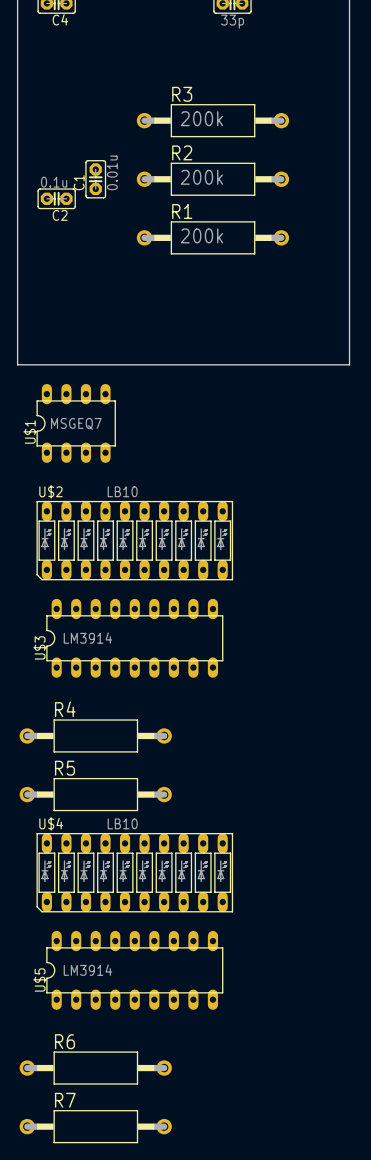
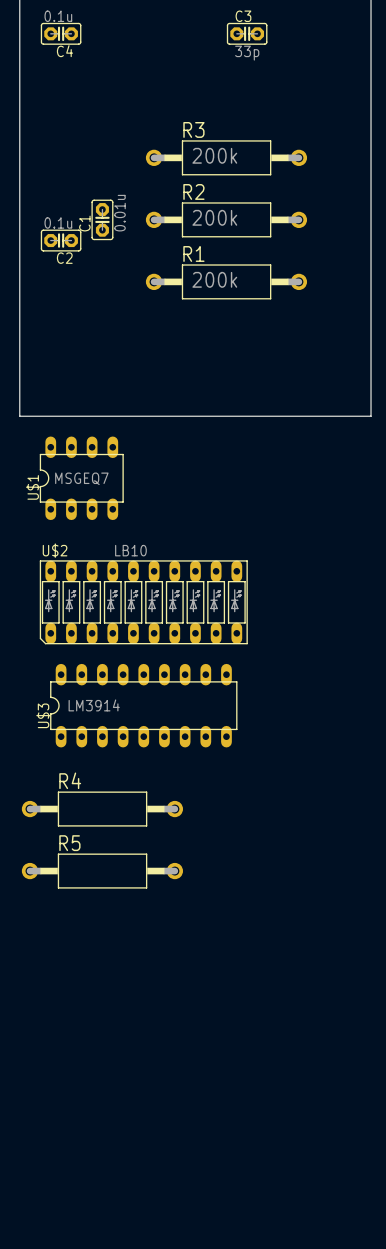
U$4: LB10 (134, 872) -> none
U$5: LM3914 (134, 970) -> none
R6: (95, 1068) -> none
R7: (95, 1126) -> none

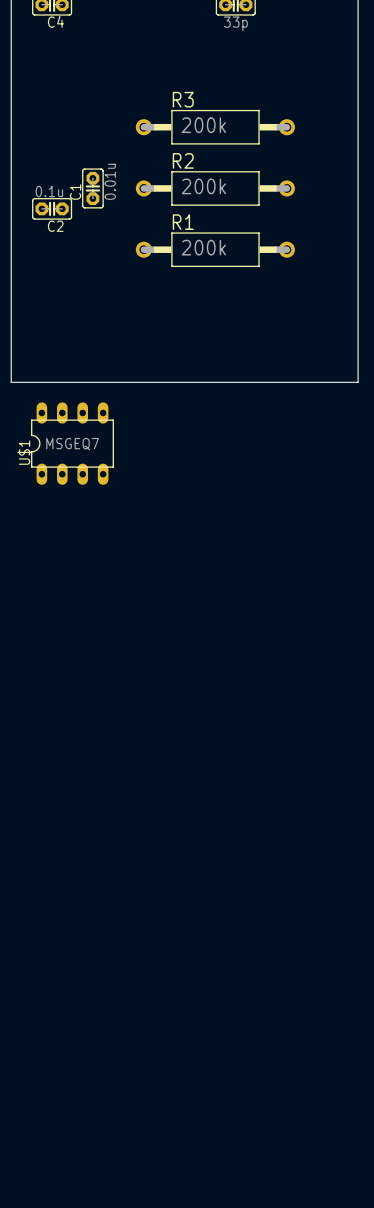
U$2: LB10 (143, 602) -> none
U$3: LM3914 (143, 705) -> none
R4: (102, 809) -> none
R5: (102, 871) -> none

